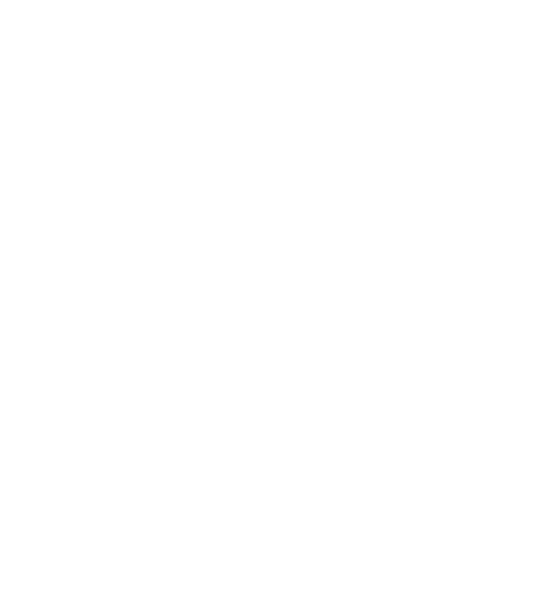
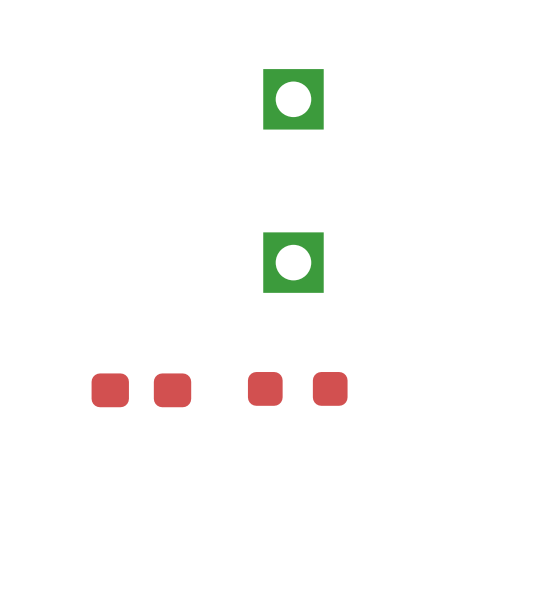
part: none -> (293, 99)
part: none -> (293, 262)
part: none -> (297, 388)
part: none -> (141, 390)

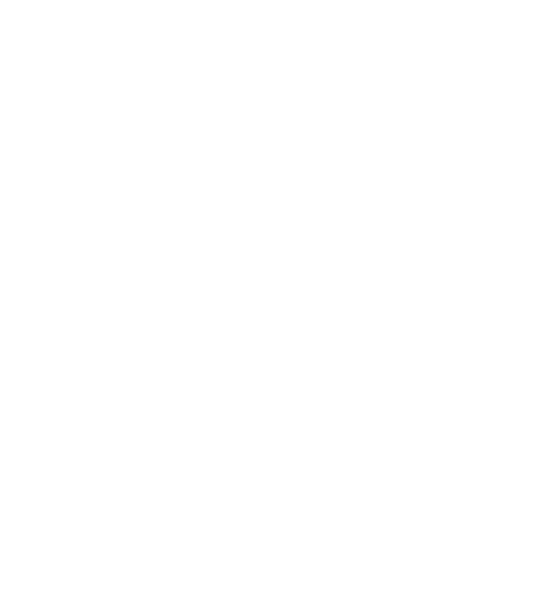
part: (293, 99) -> none
part: (293, 262) -> none
part: (297, 388) -> none
part: (141, 390) -> none

